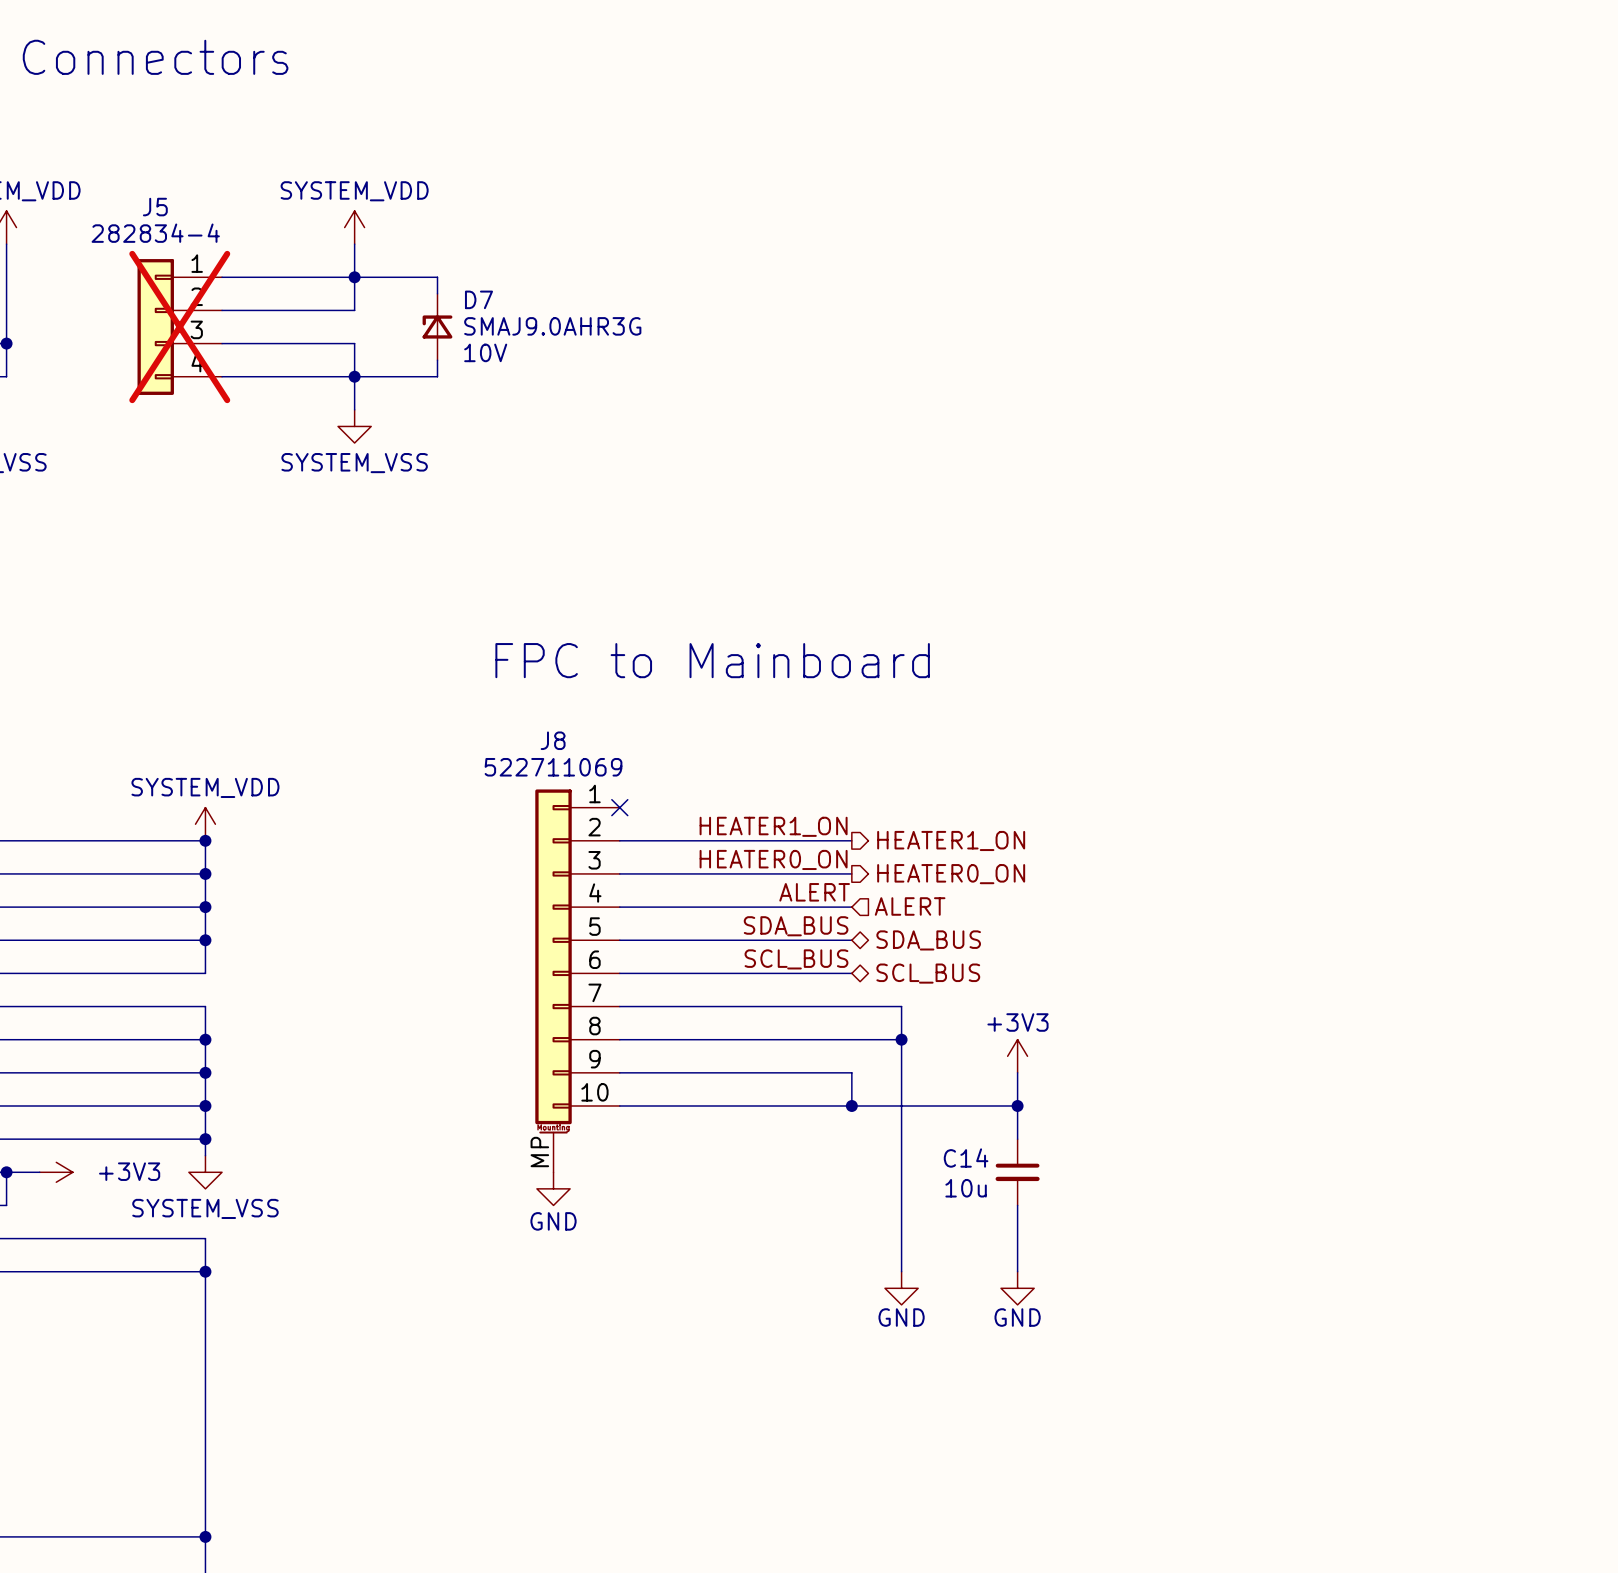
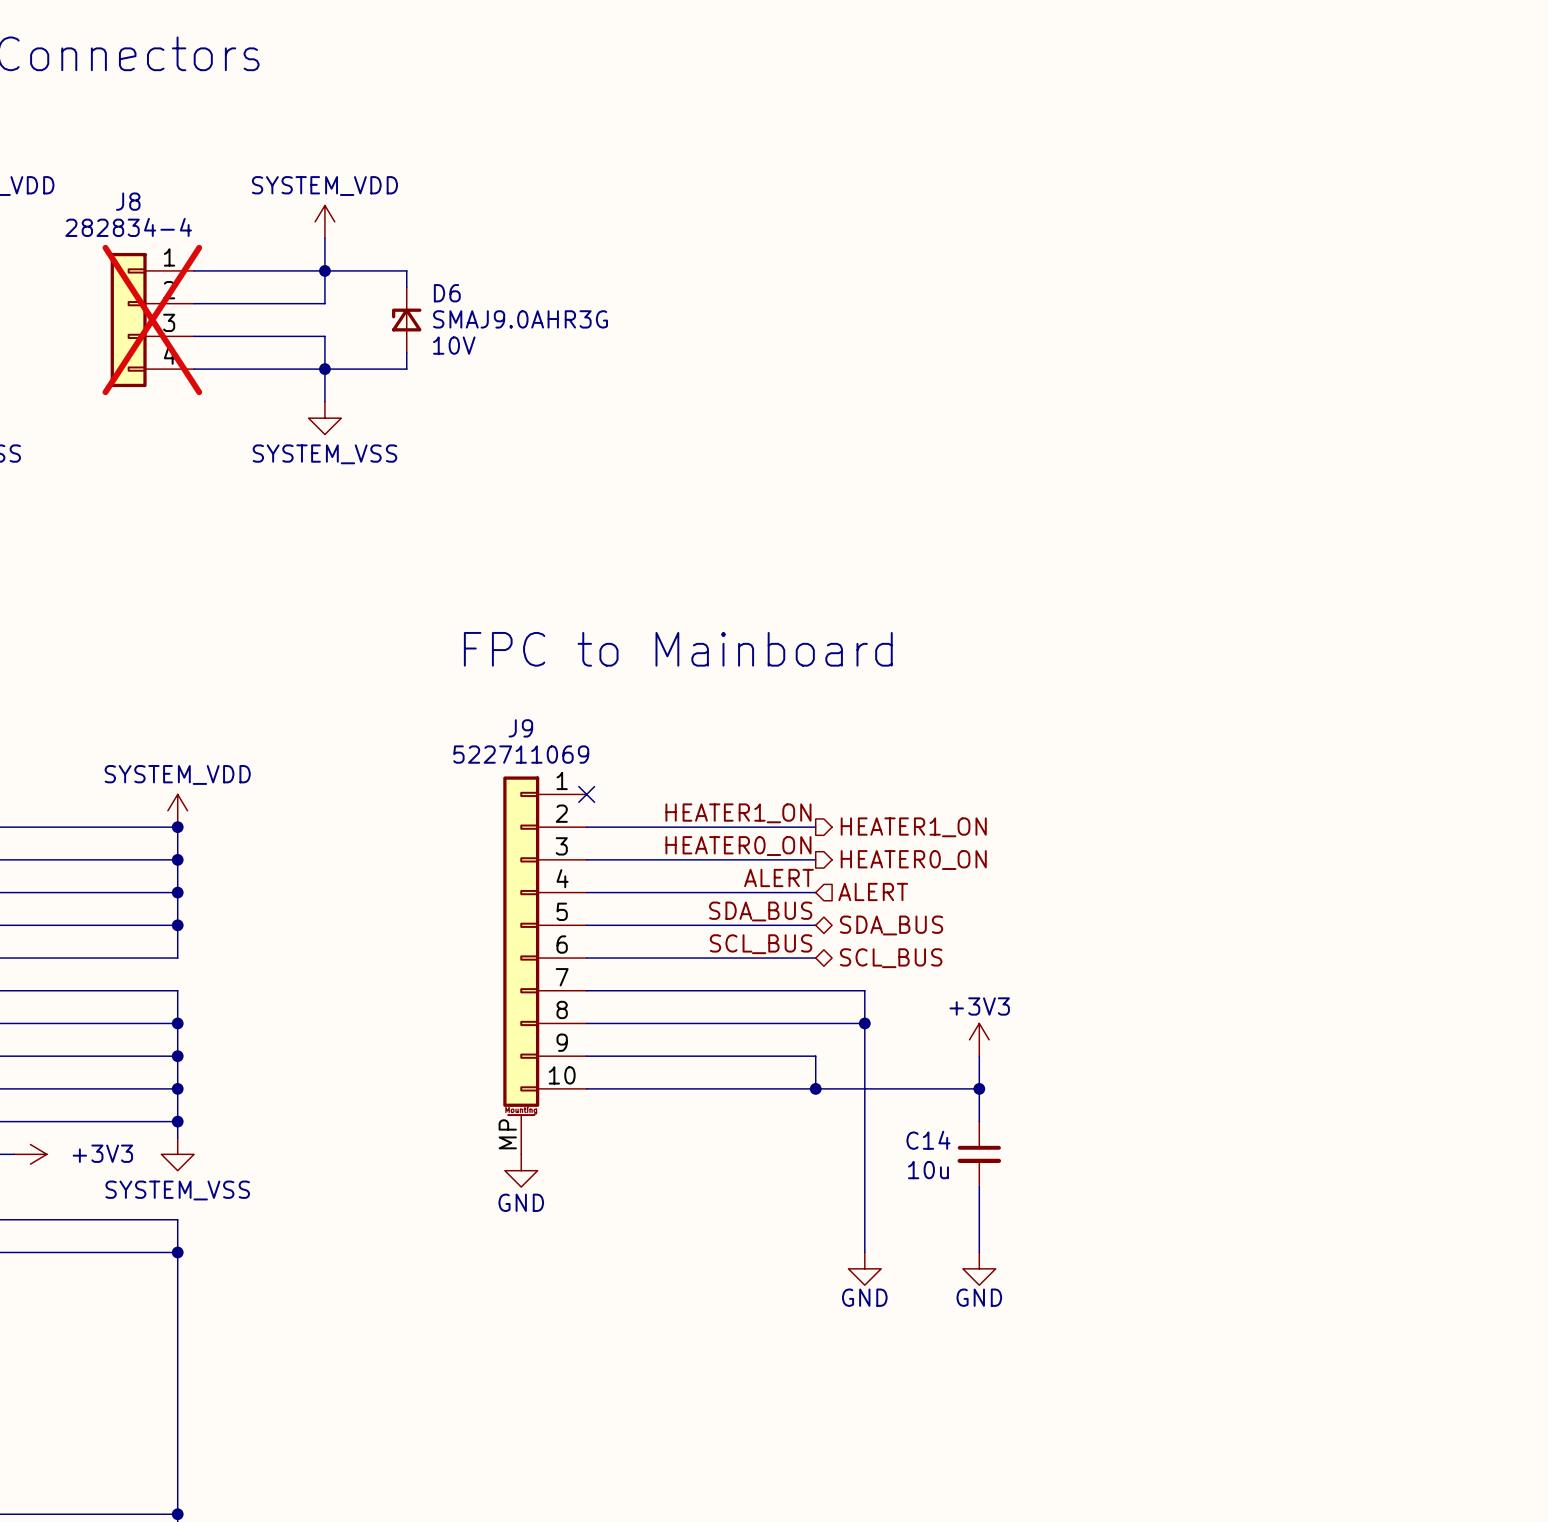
J5 name: J5 (155, 207) -> J8 (128, 201)
D7 name: D7 (478, 299) -> D6 (447, 293)
J8 name: J8 (553, 740) -> J9 (520, 728)

